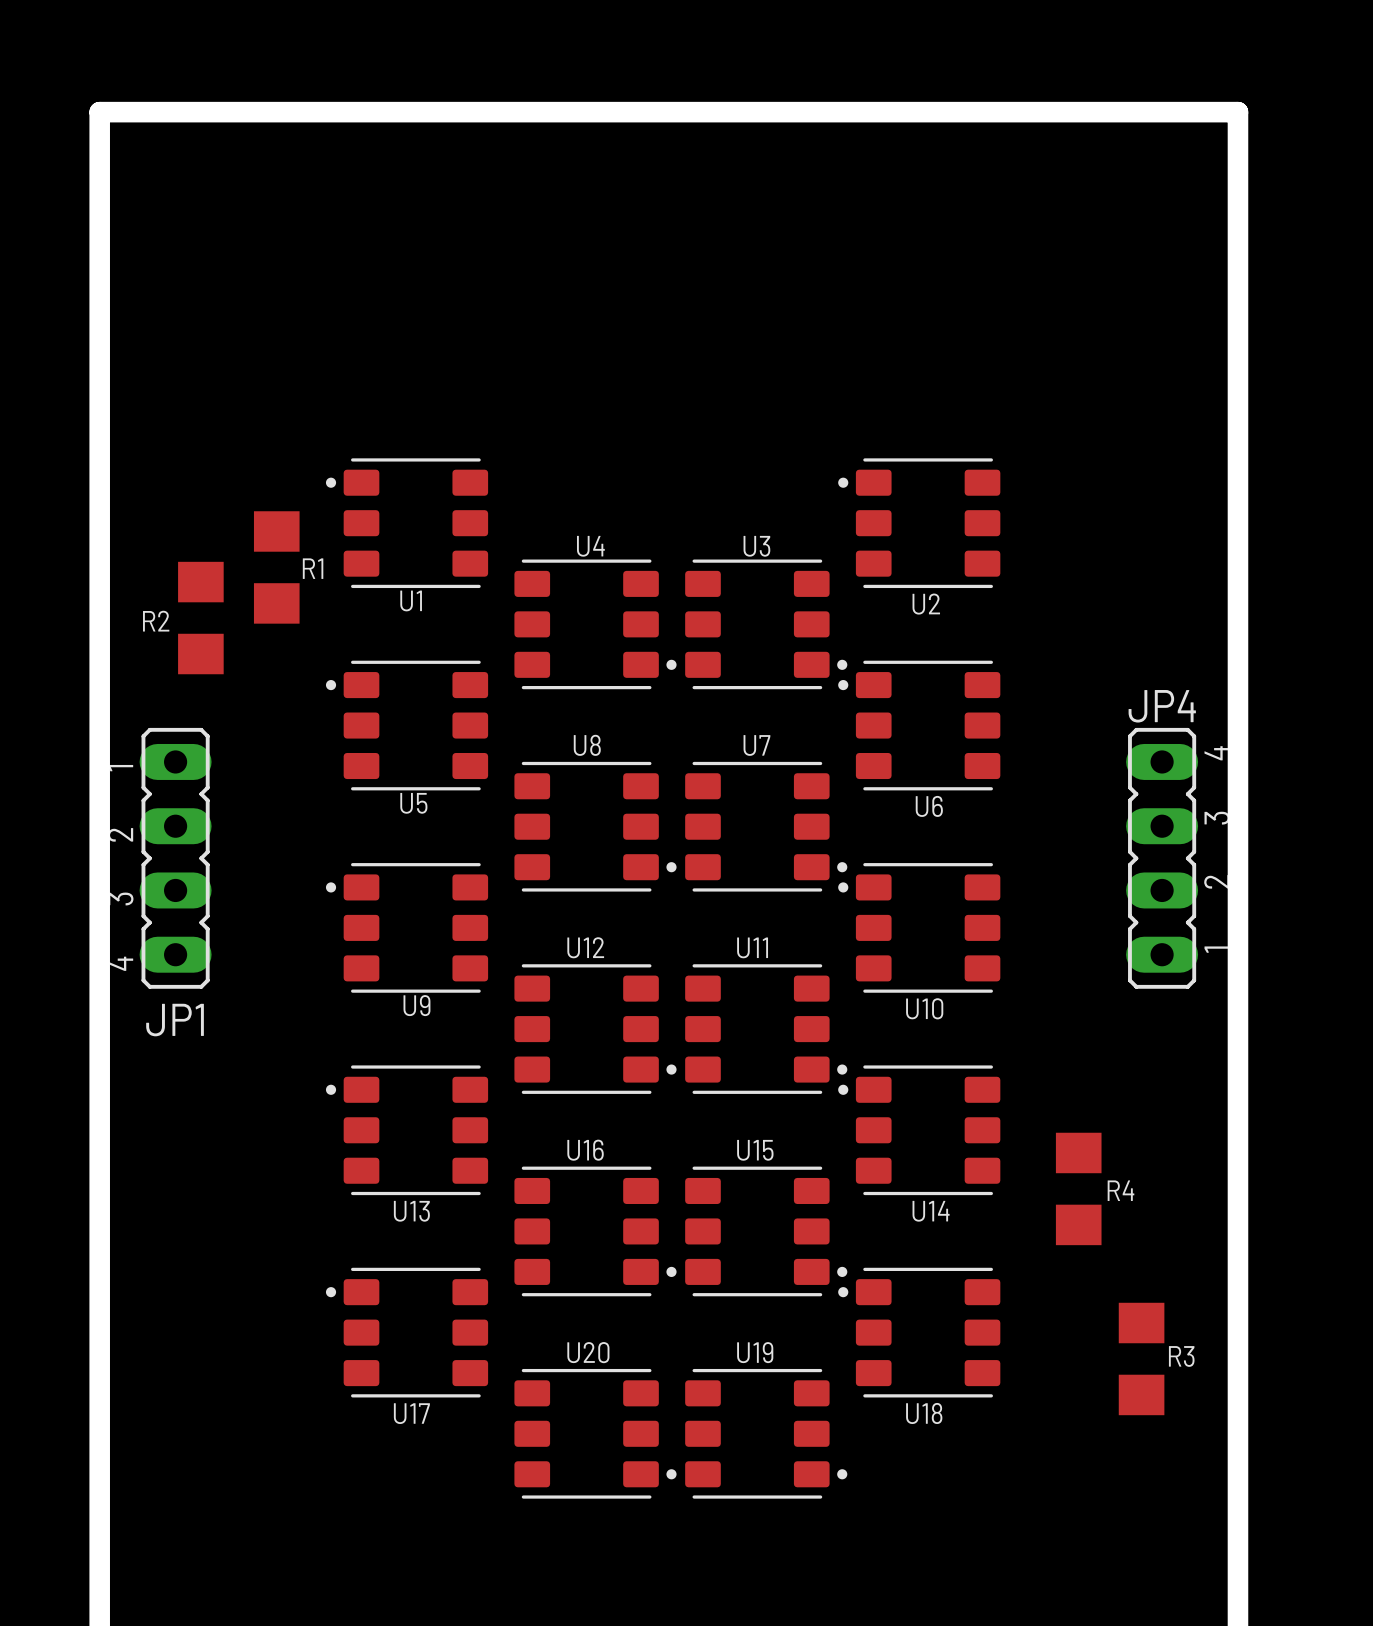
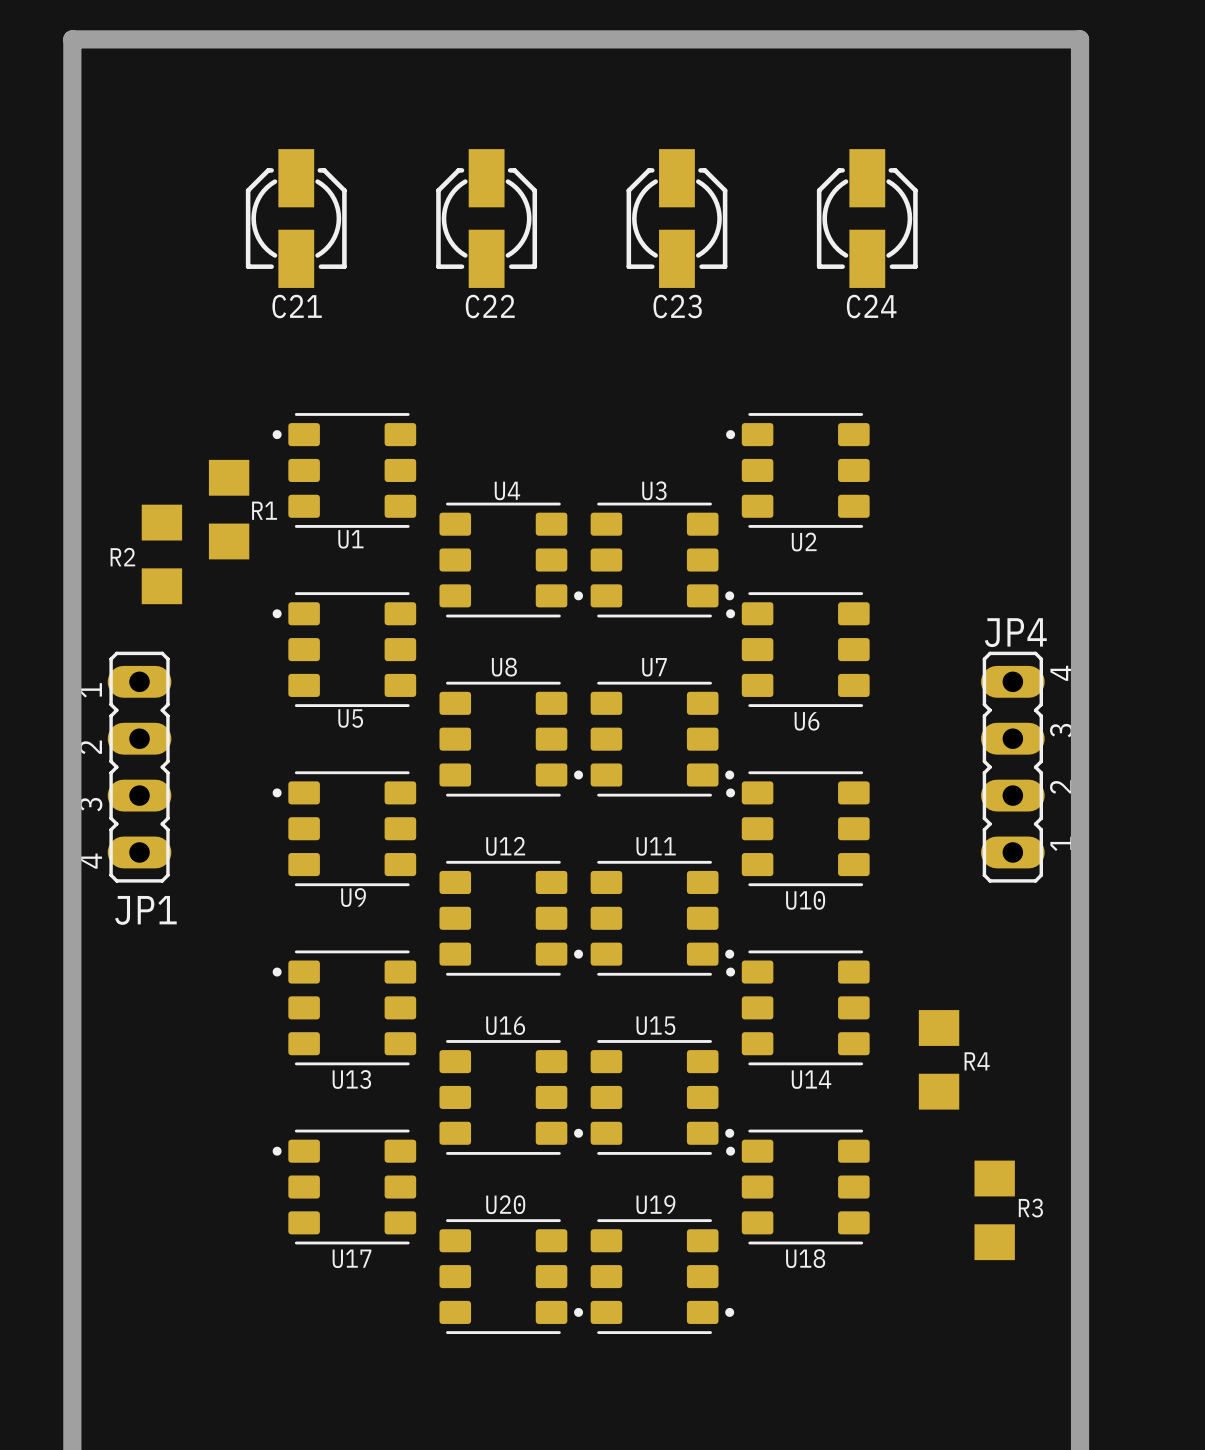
board edge: (99, 112) (1237, 112) -> (72, 106) (72, 39) (1080, 39) (1080, 106)
C21: none -> (296, 218)
C22: none -> (486, 218)
C23: none -> (676, 218)
C24: none -> (867, 218)

